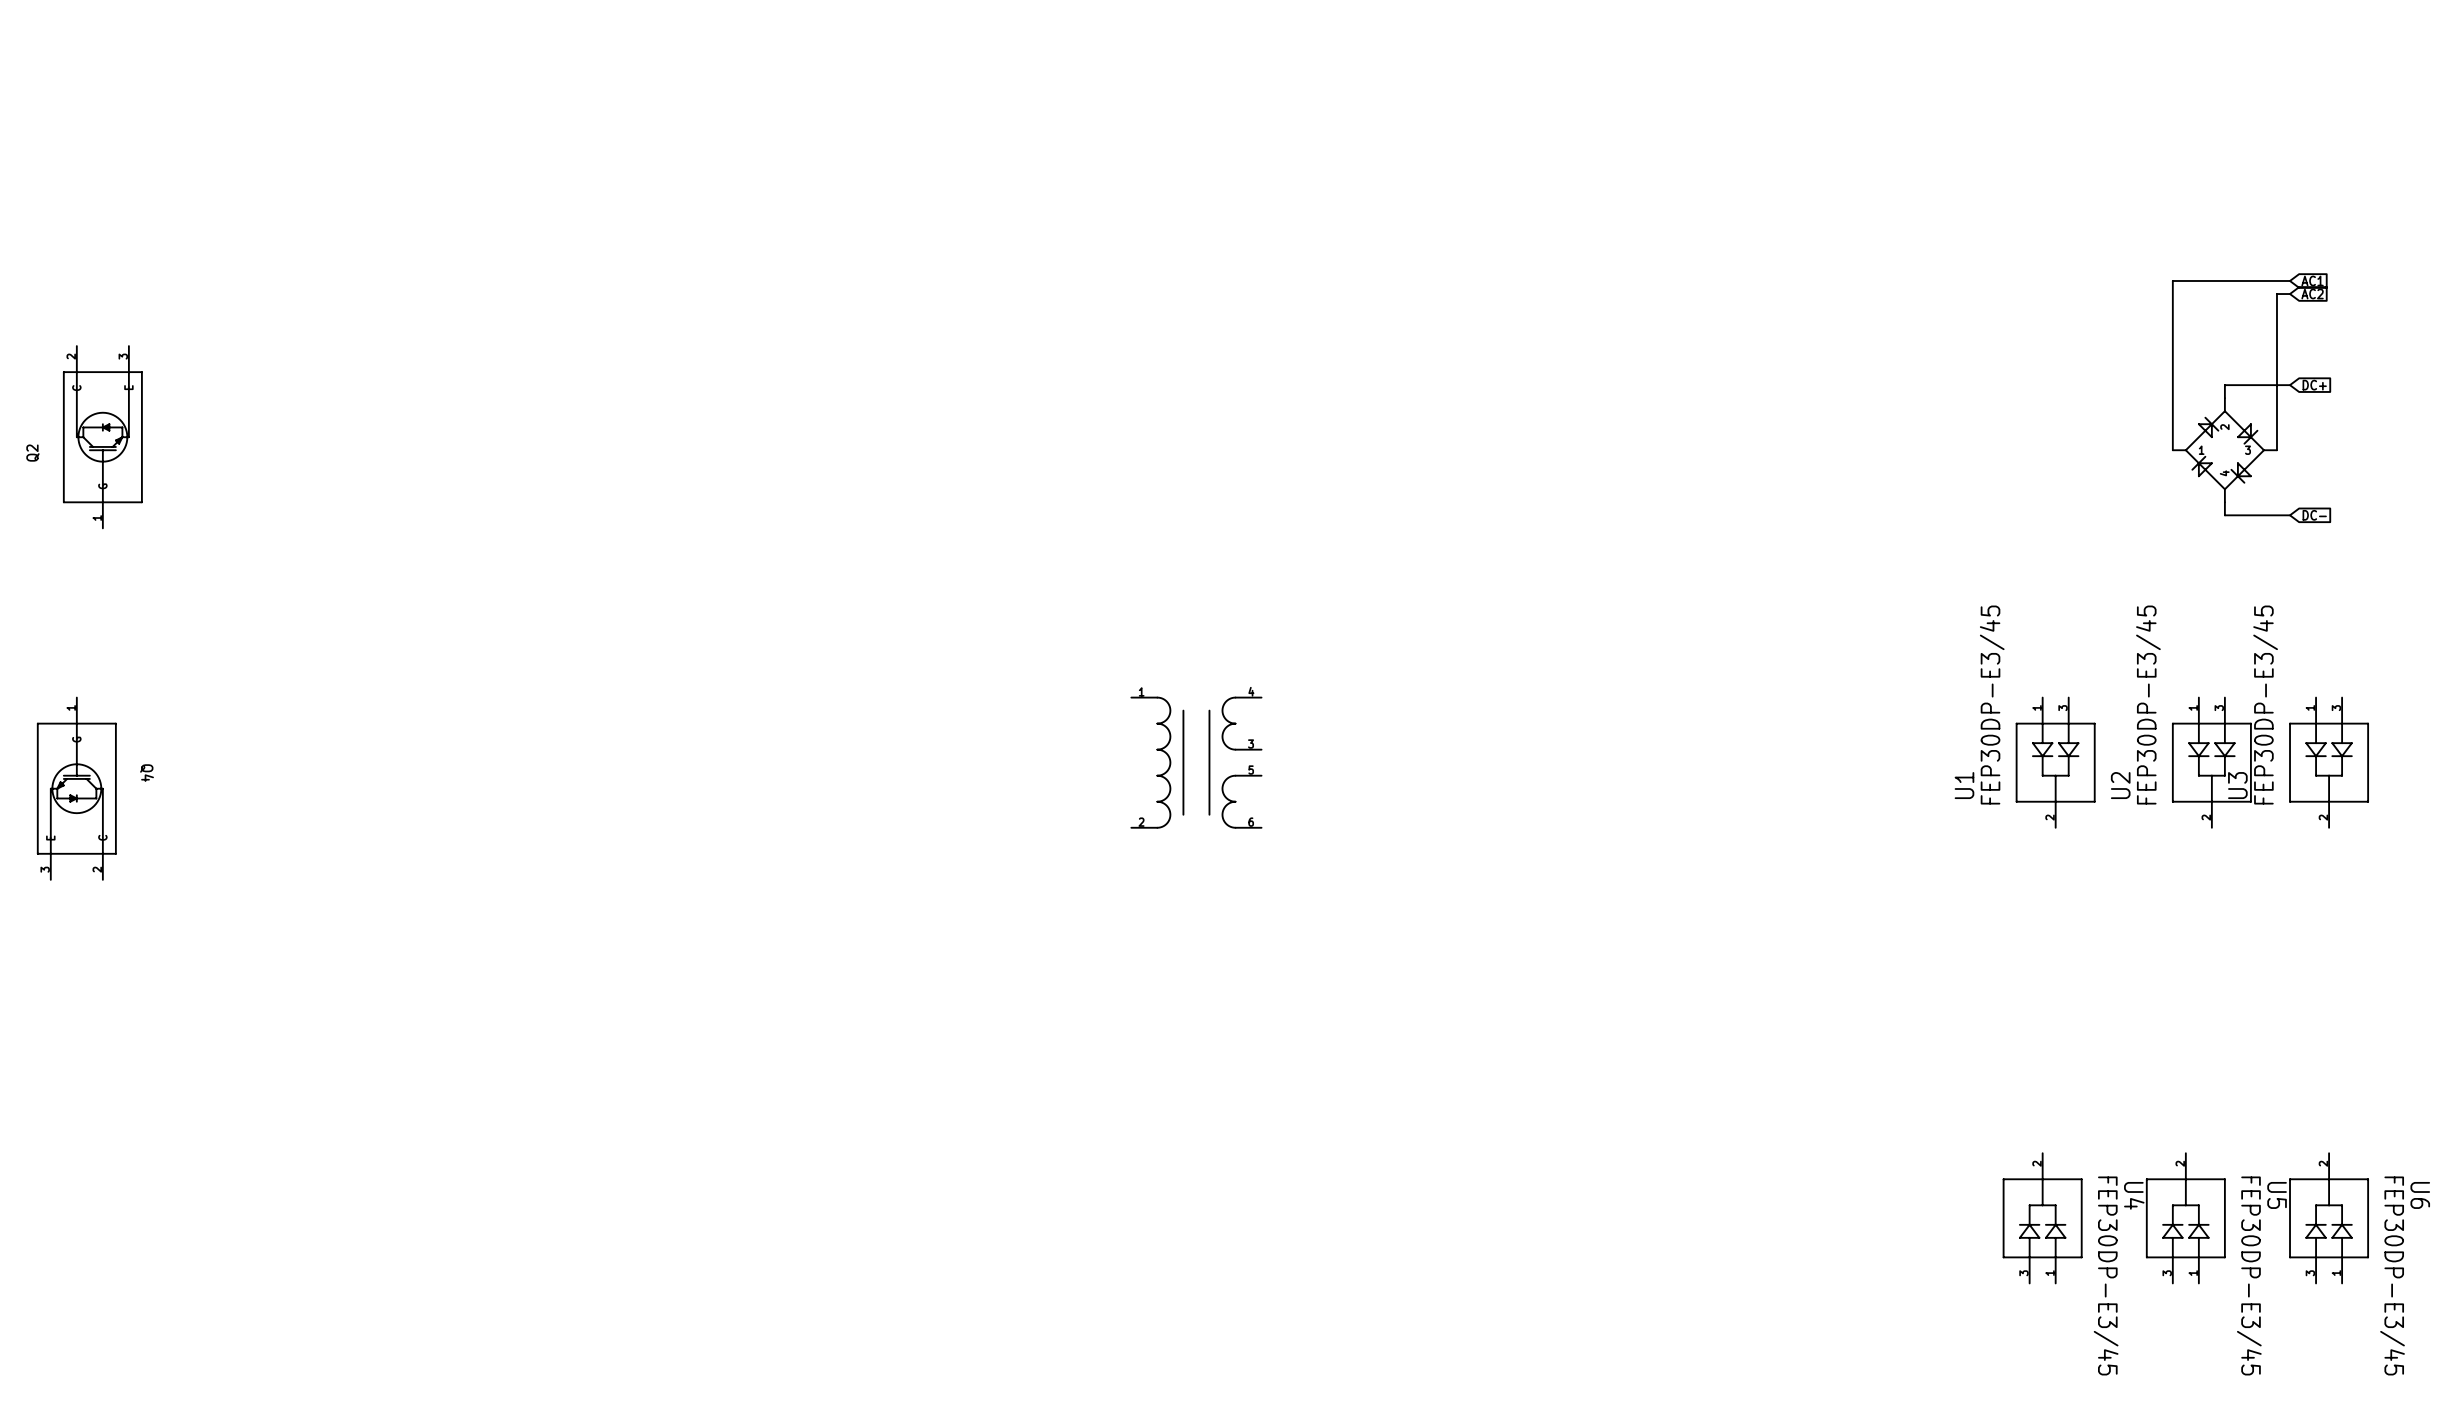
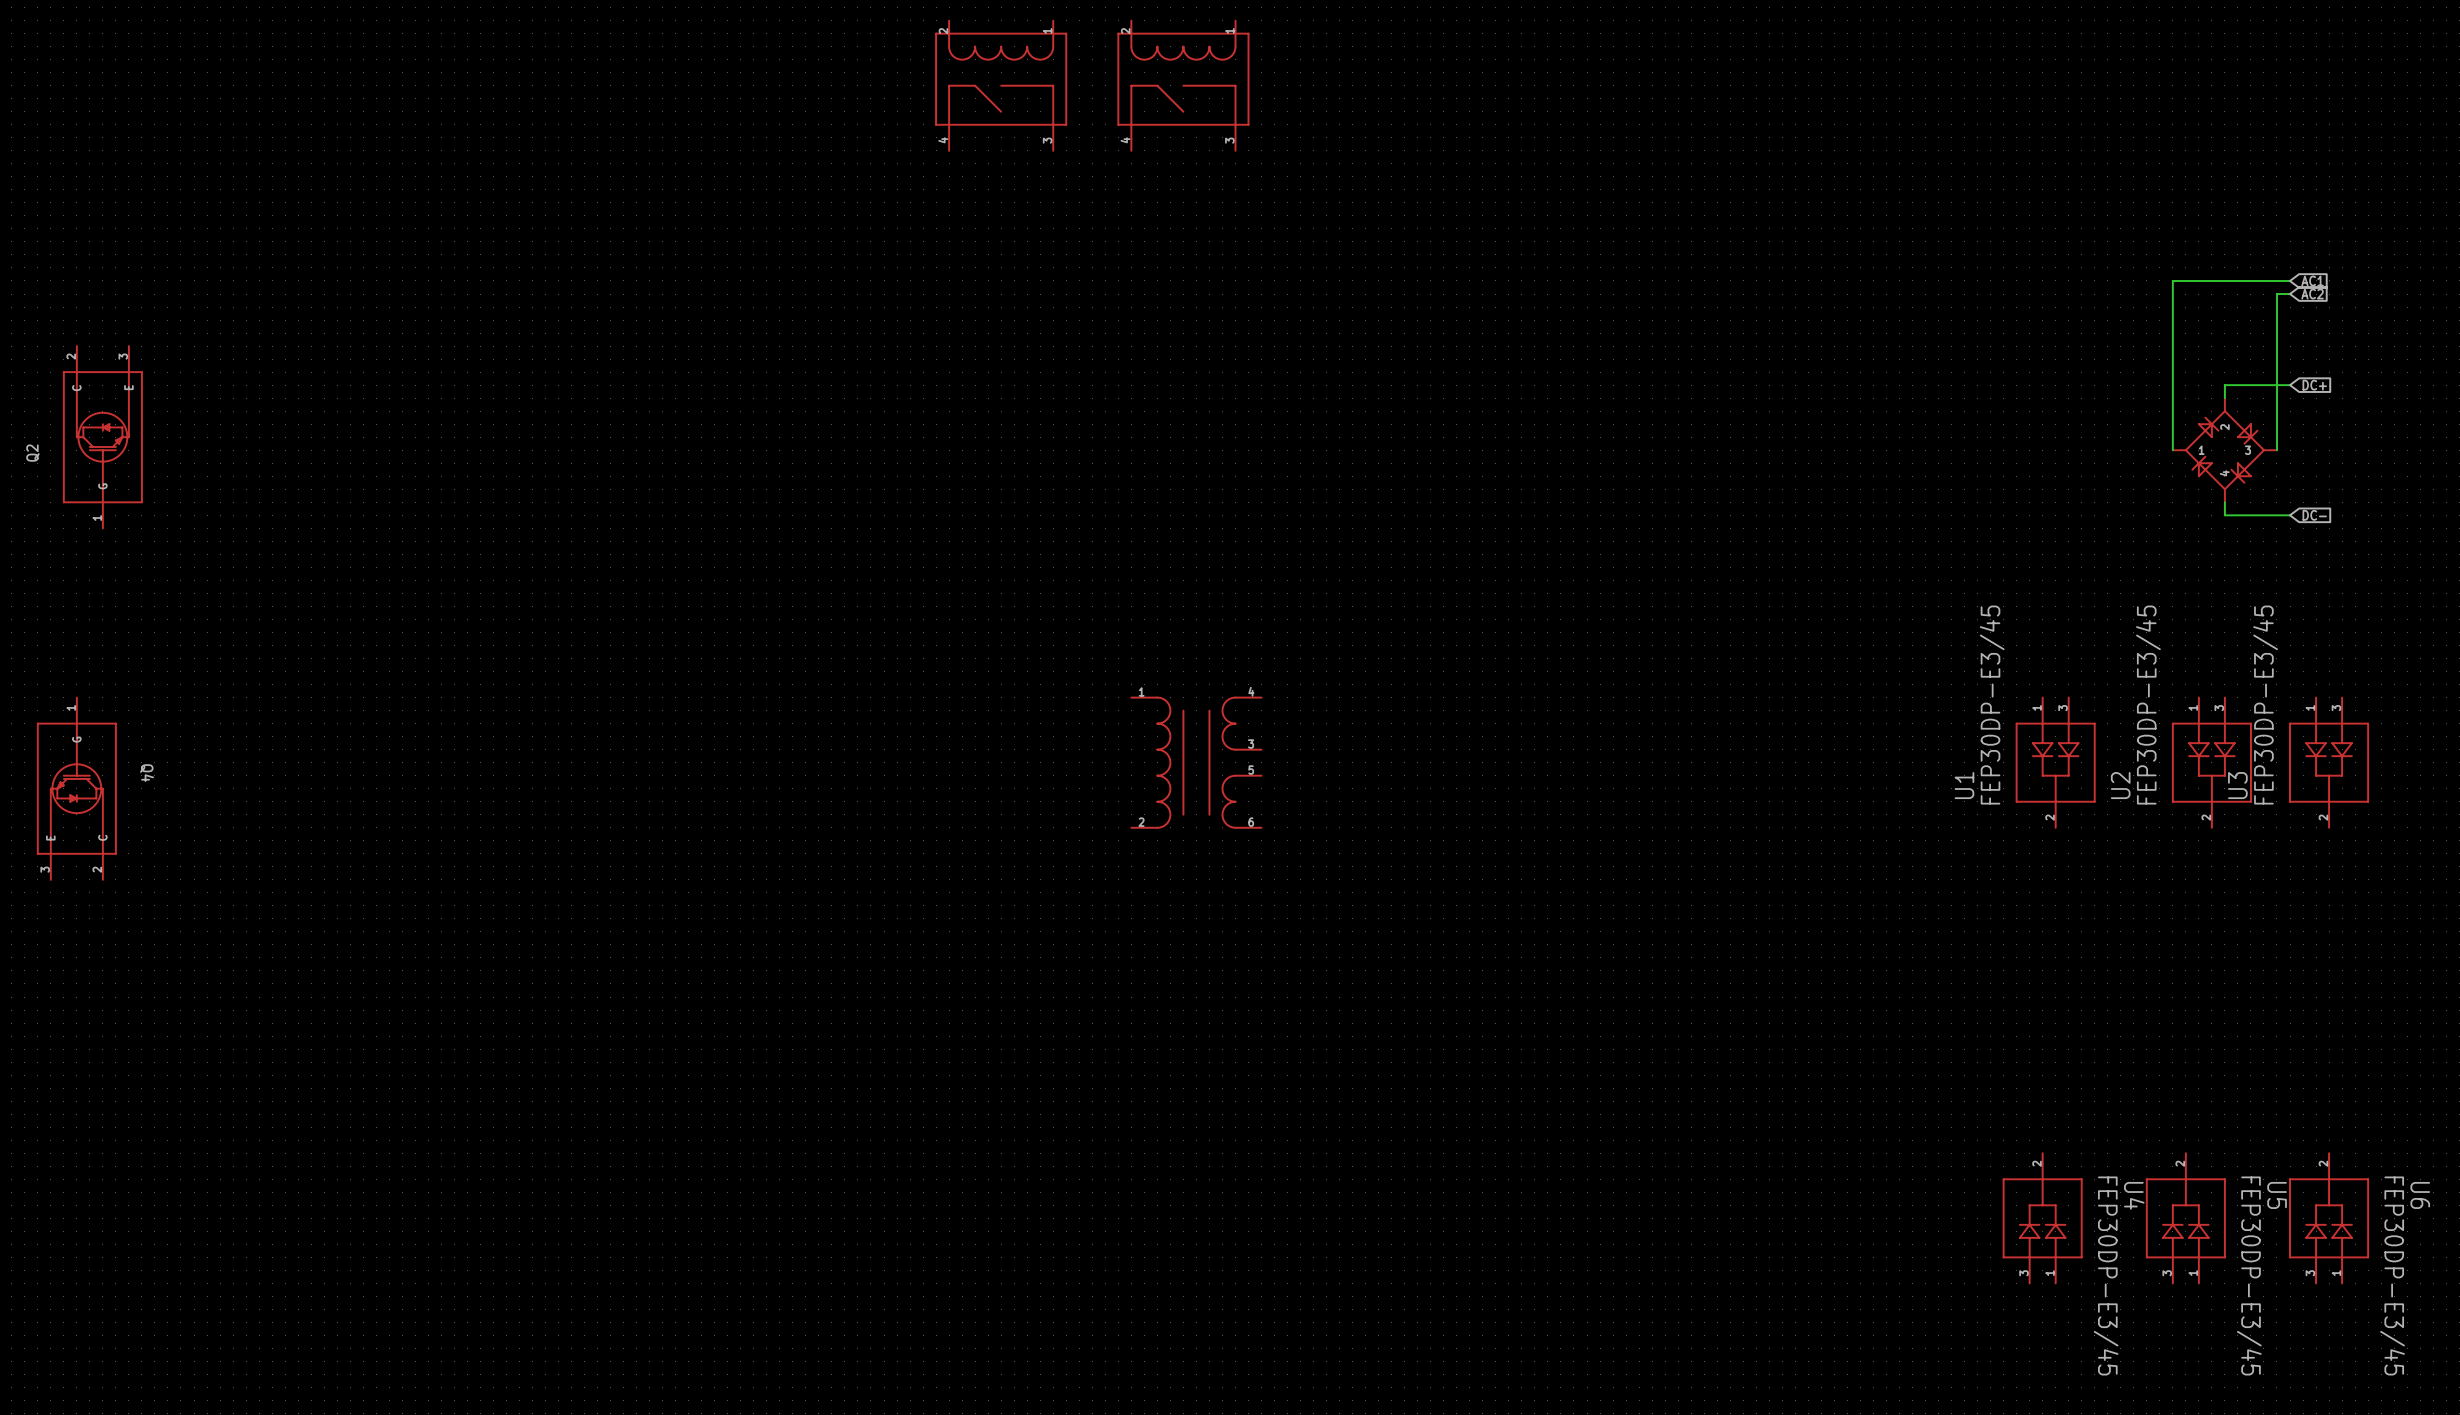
part: none -> (1001, 85)
part: none -> (1183, 85)

